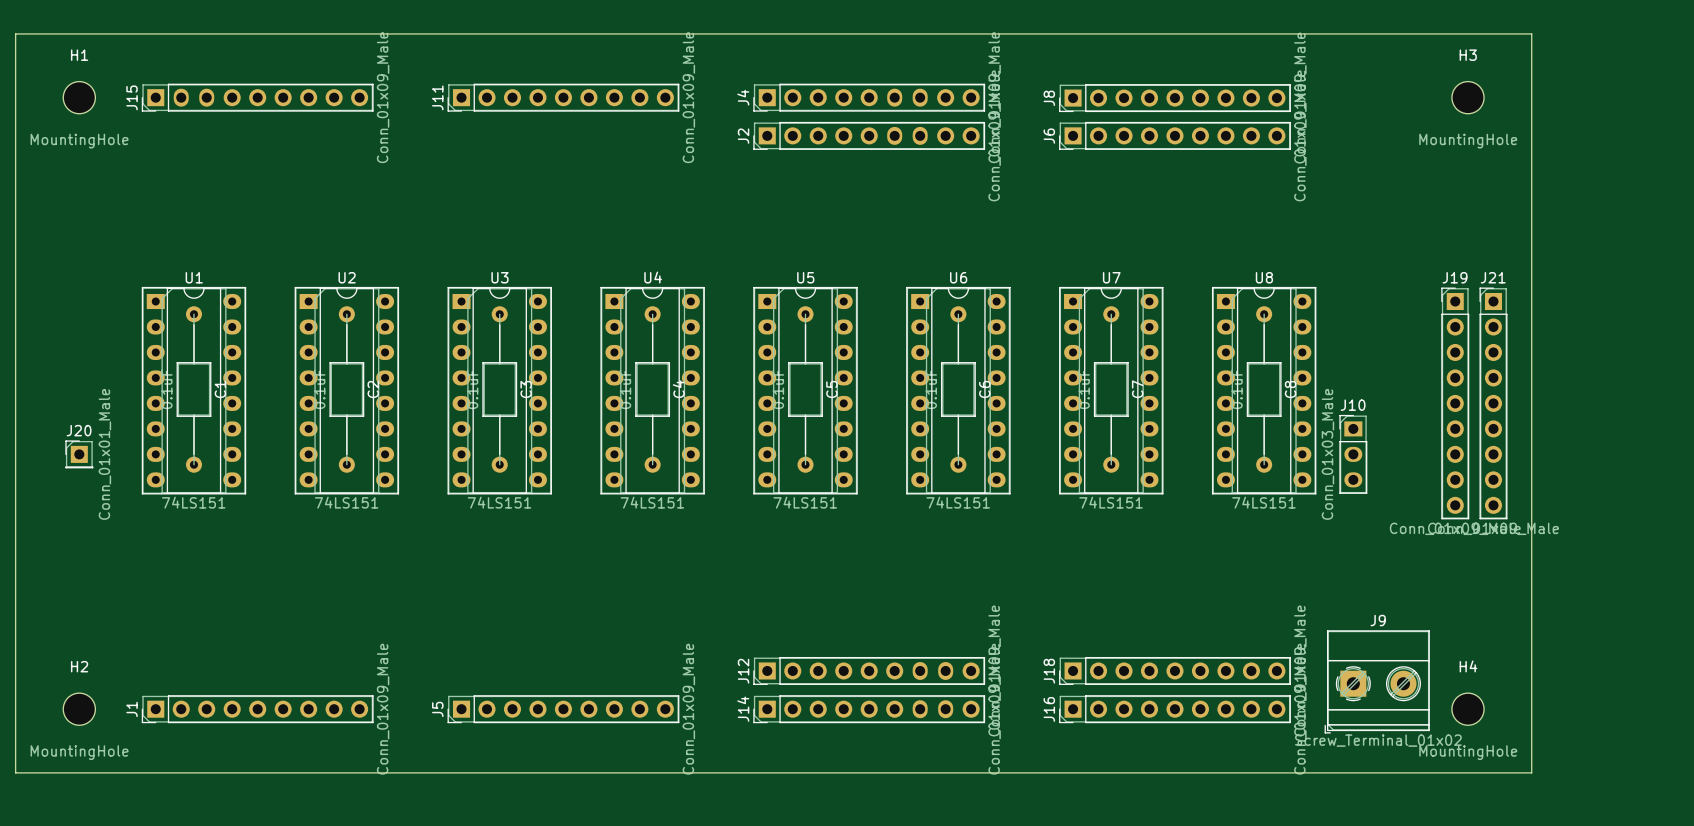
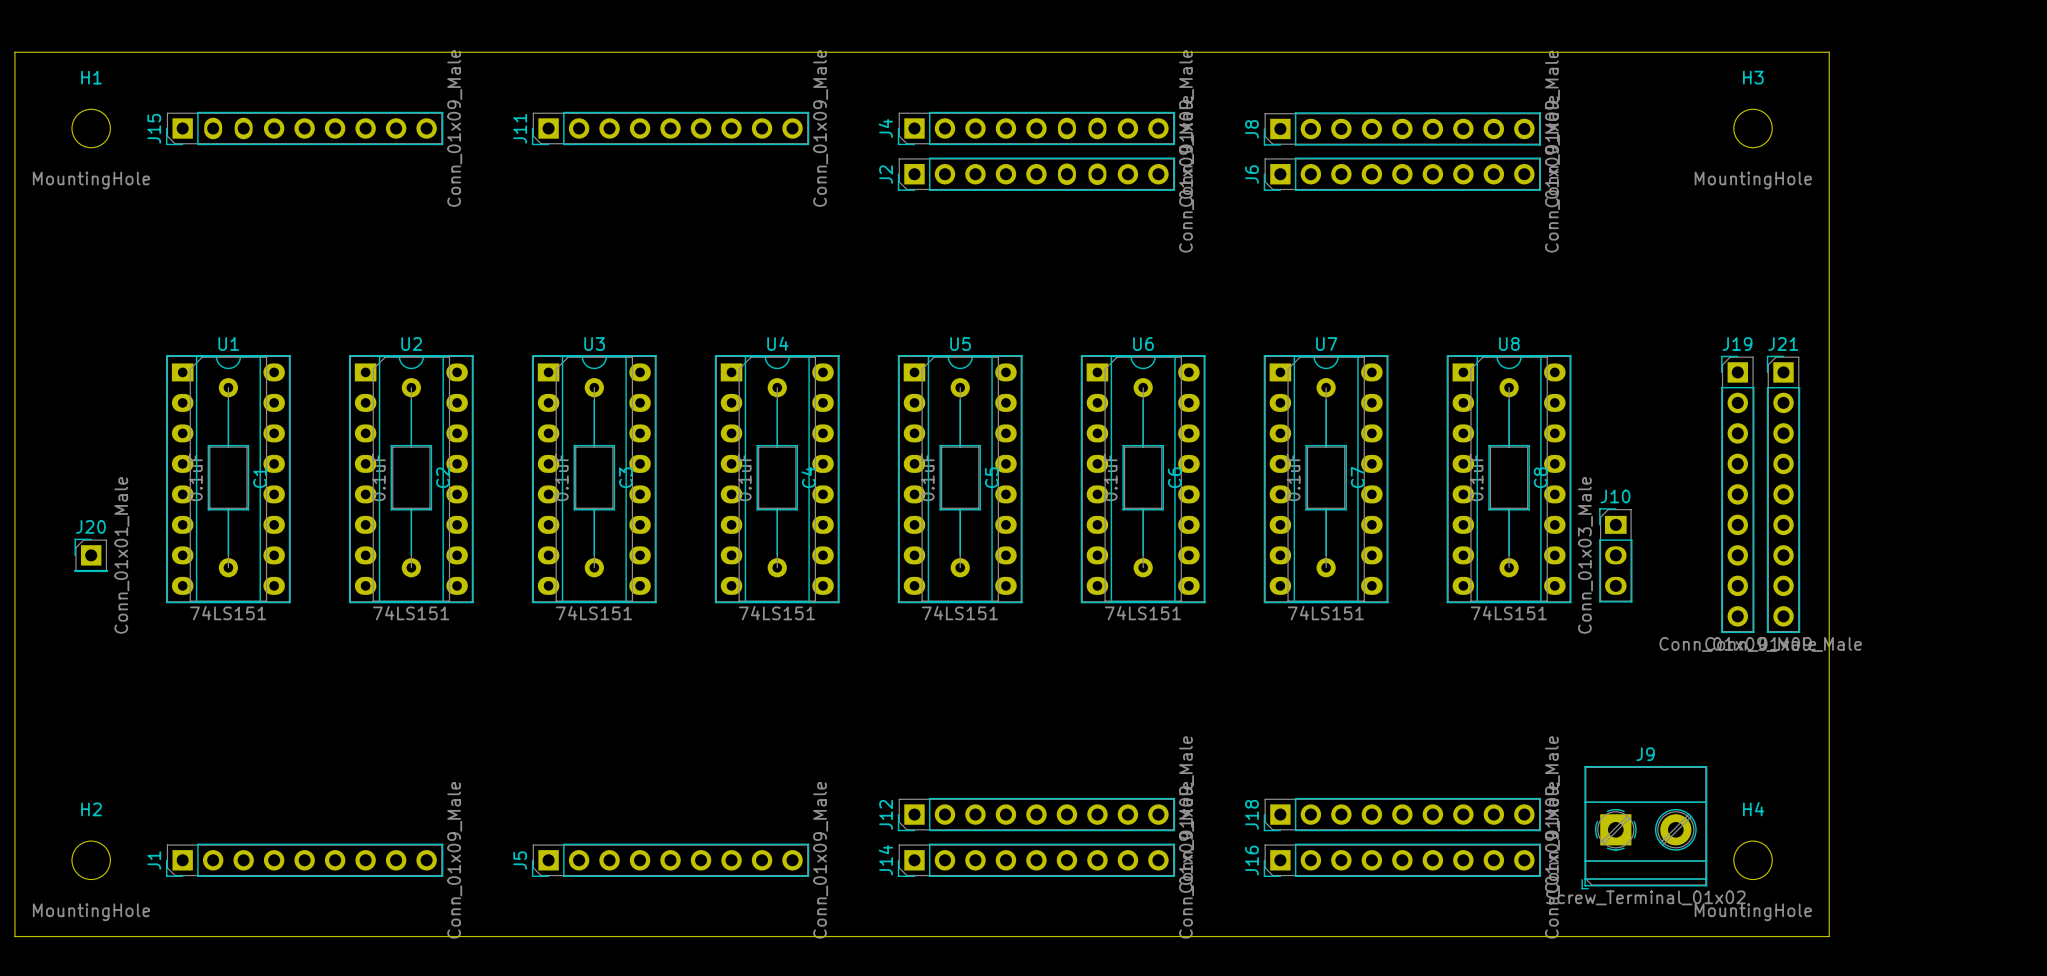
J12 footprint: [753, 657, 986, 685] -> [897, 797, 1176, 832]
J14 footprint: [753, 695, 986, 724] -> [897, 843, 1176, 877]

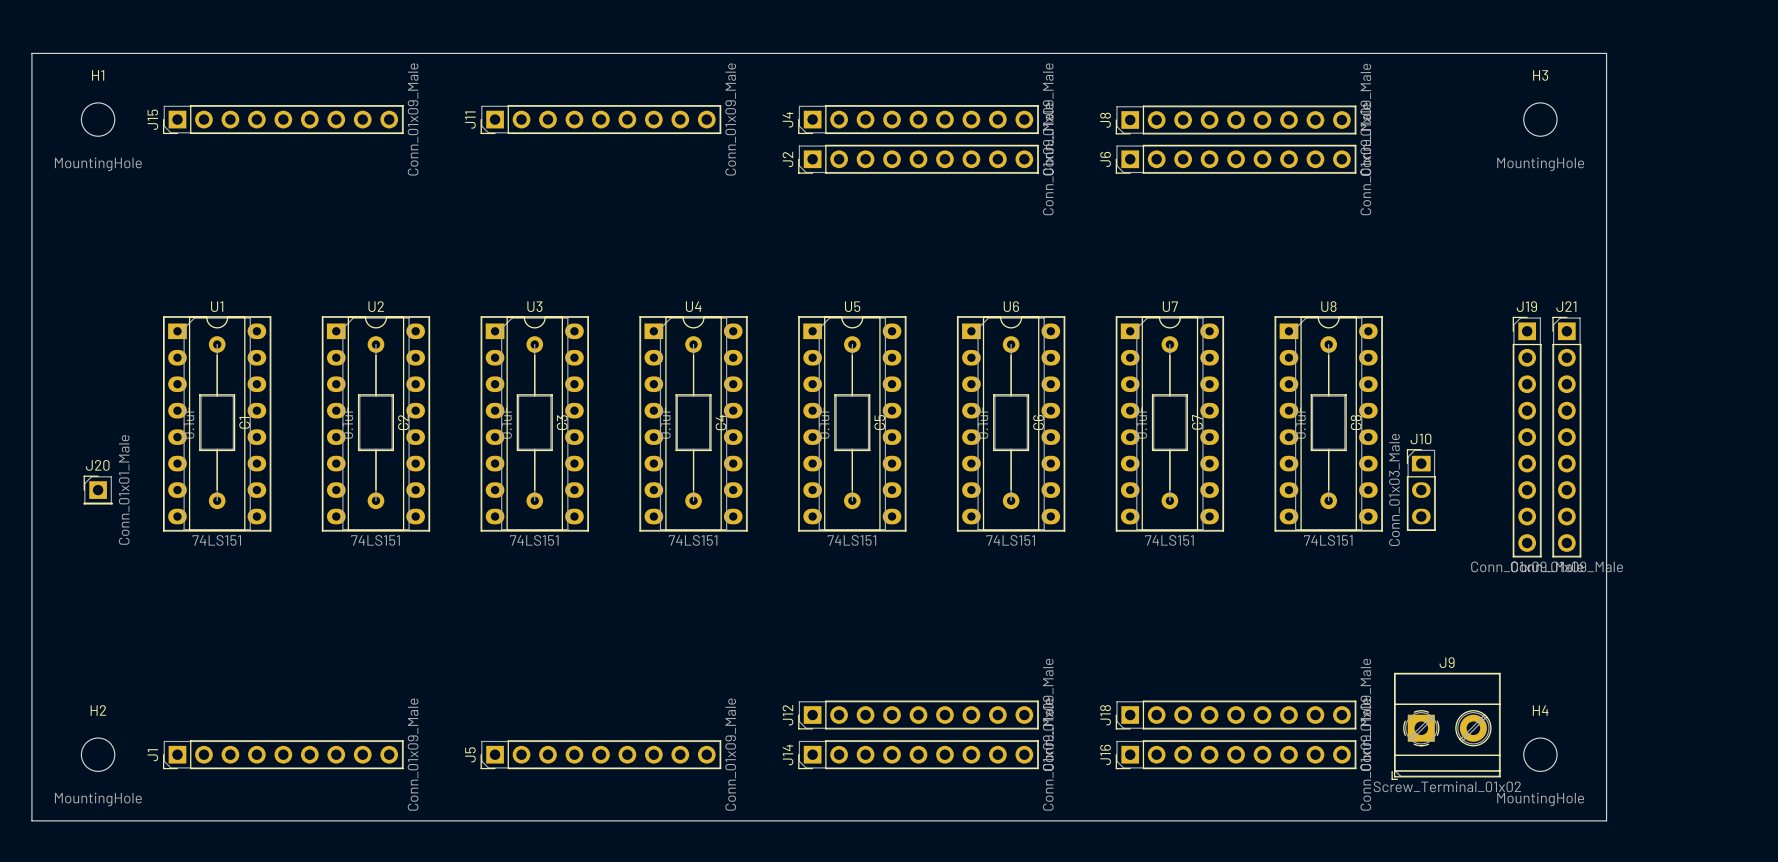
J15 footprint: [165, 111, 444, 146] -> [163, 105, 404, 135]
J4 footprint: [897, 111, 1176, 146] -> [798, 105, 1039, 135]
J2 footprint: [897, 157, 1176, 191] -> [798, 144, 1039, 174]

